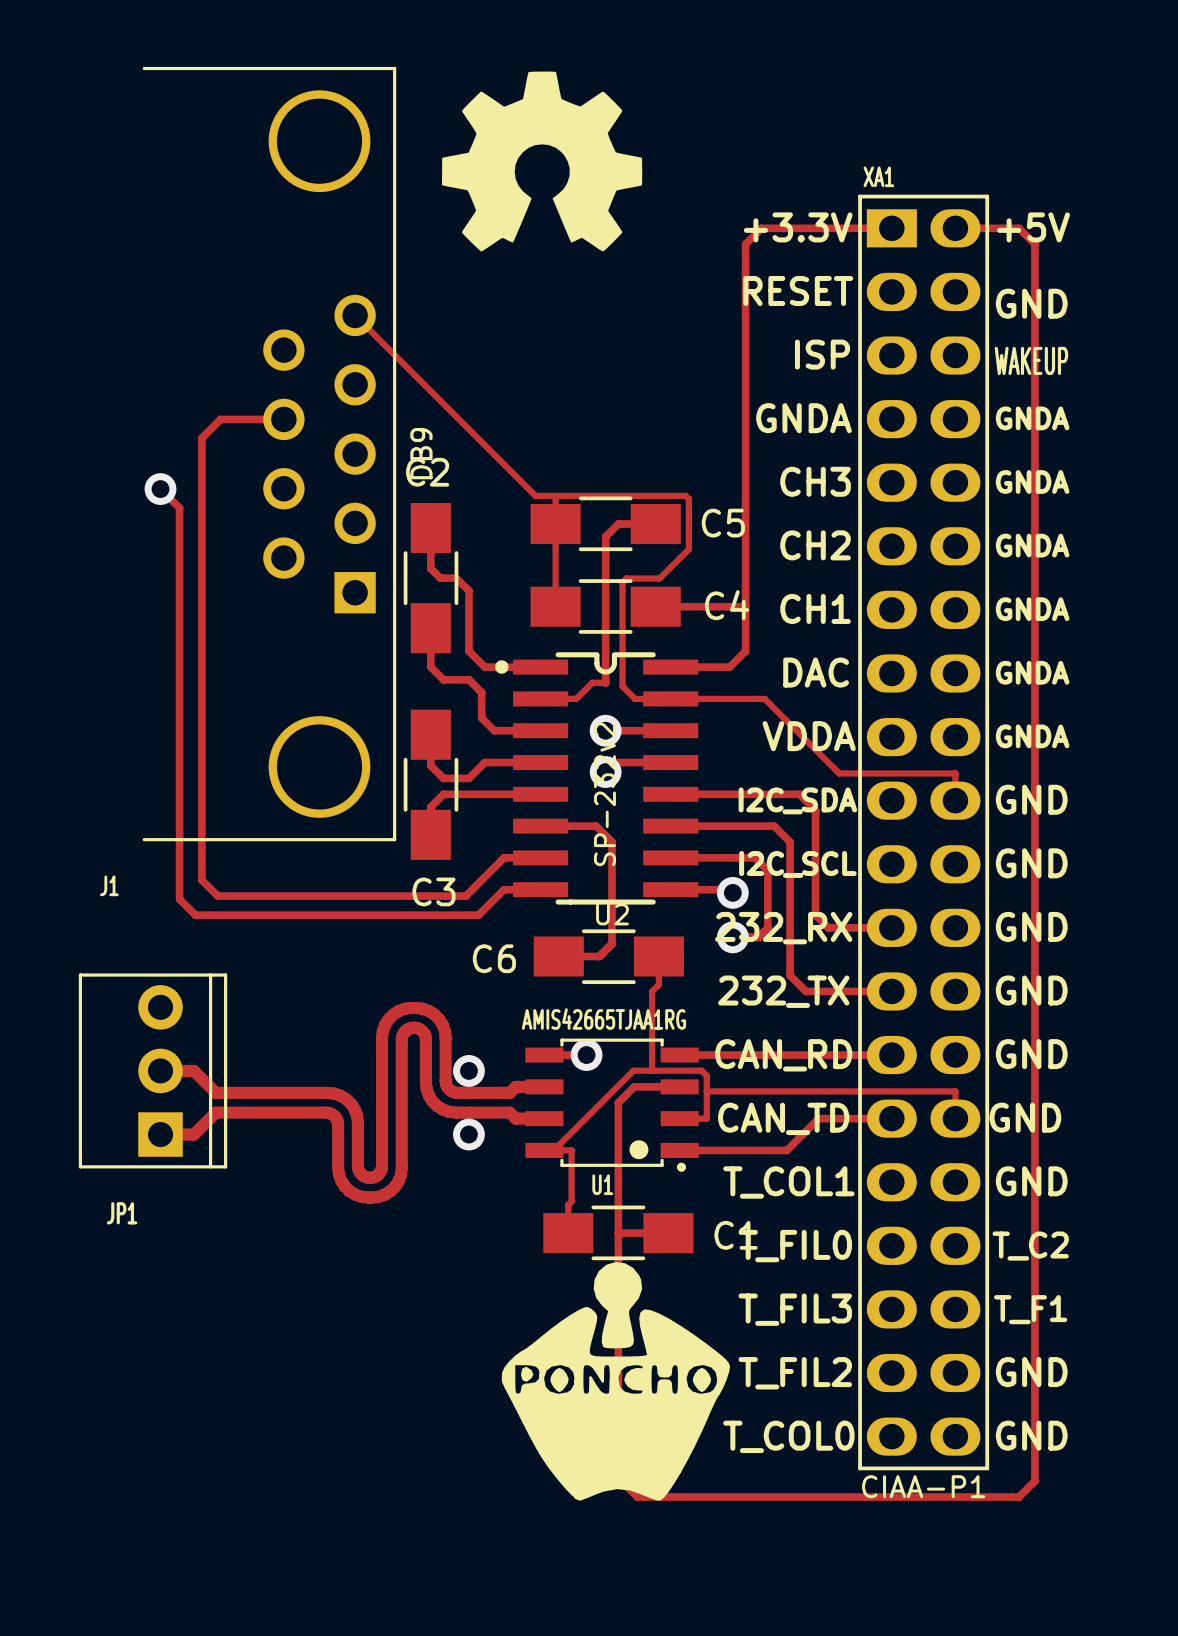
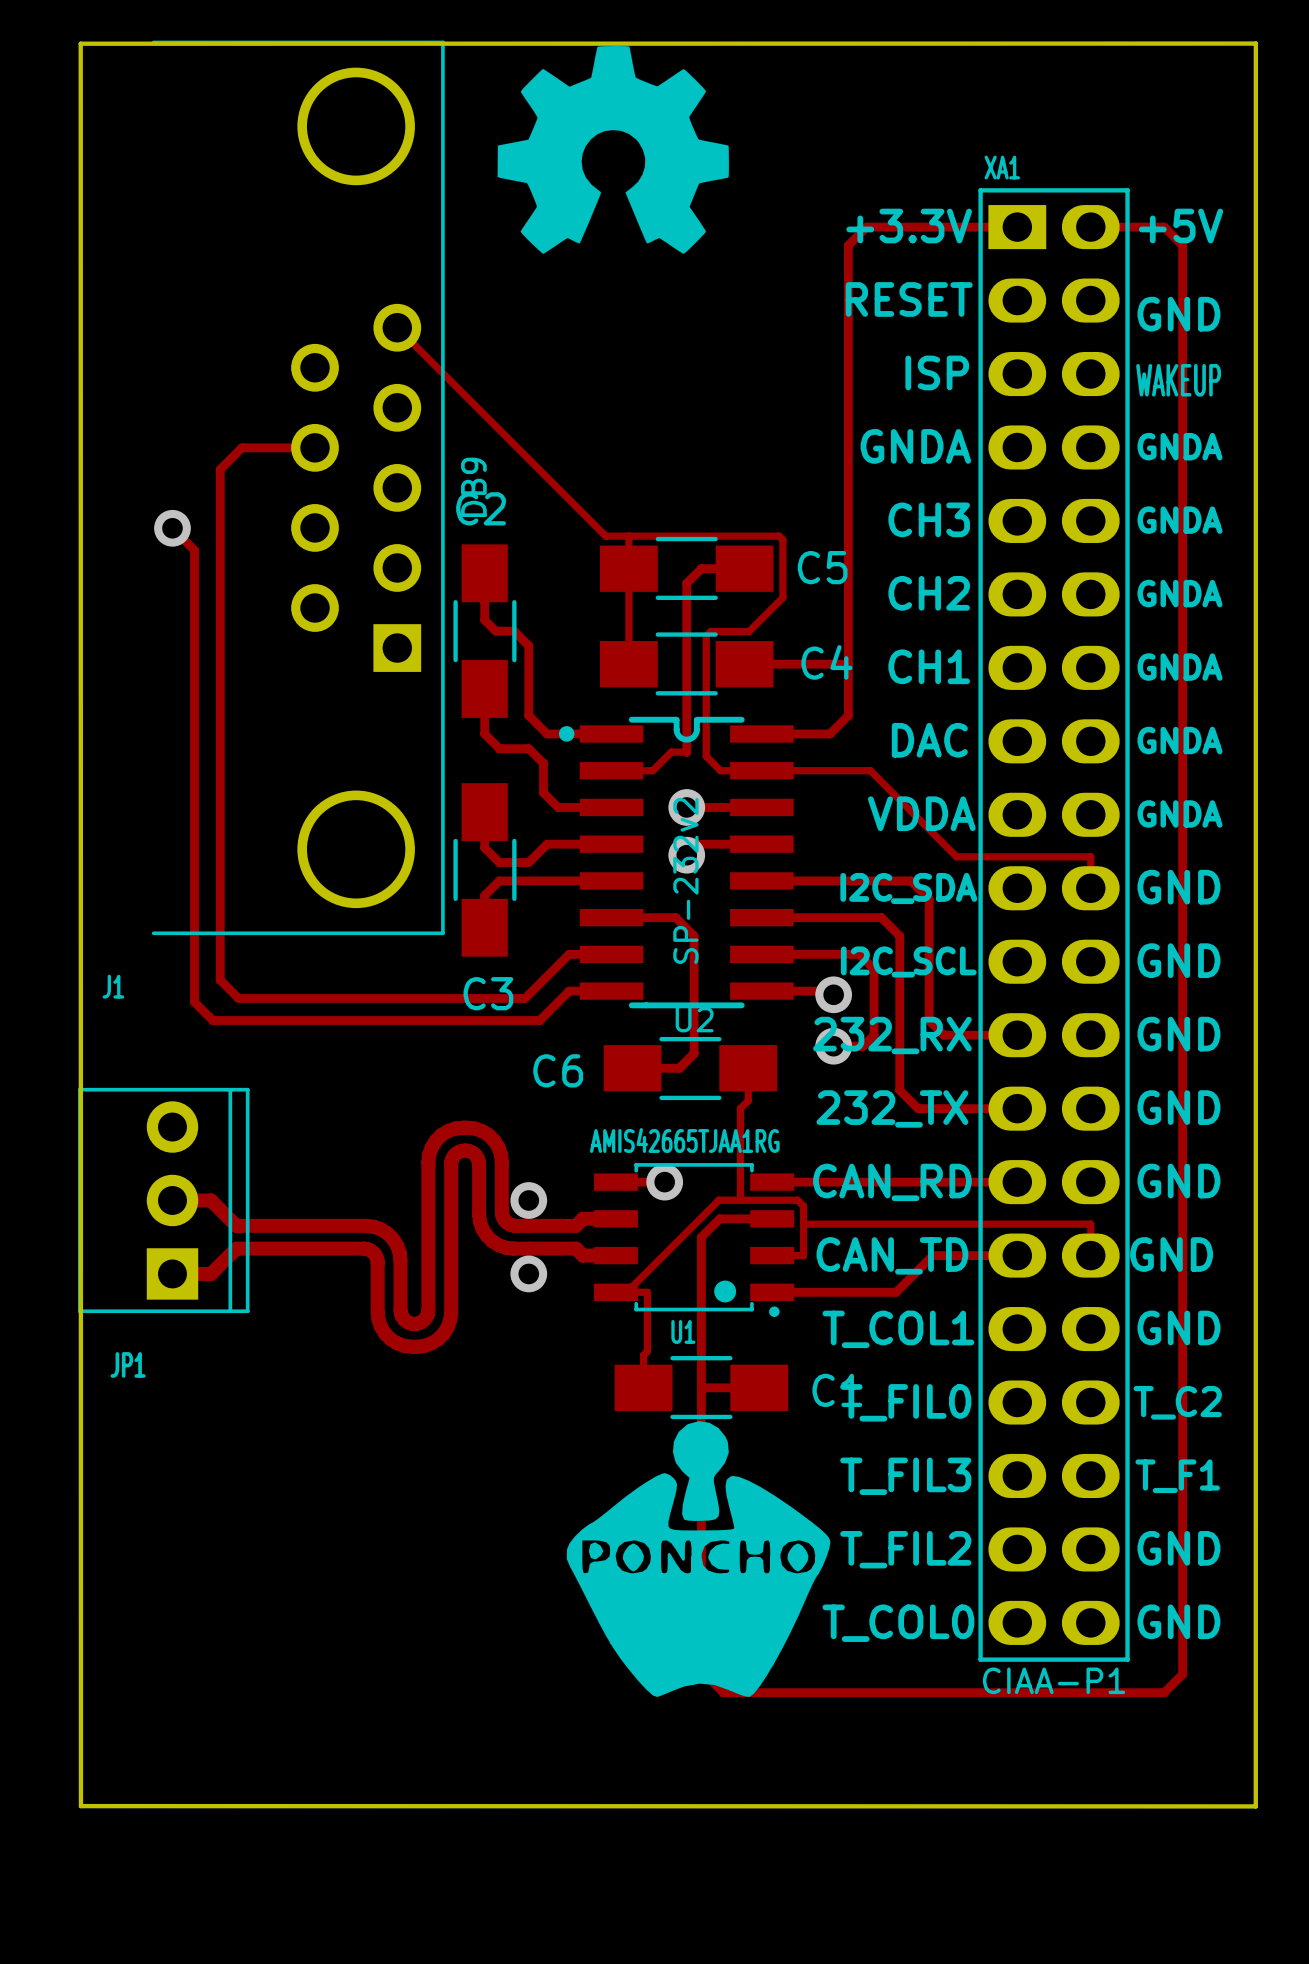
board edge: none -> (1255, 43) (1255, 1806) (80, 1806) (80, 43) (1255, 43)

